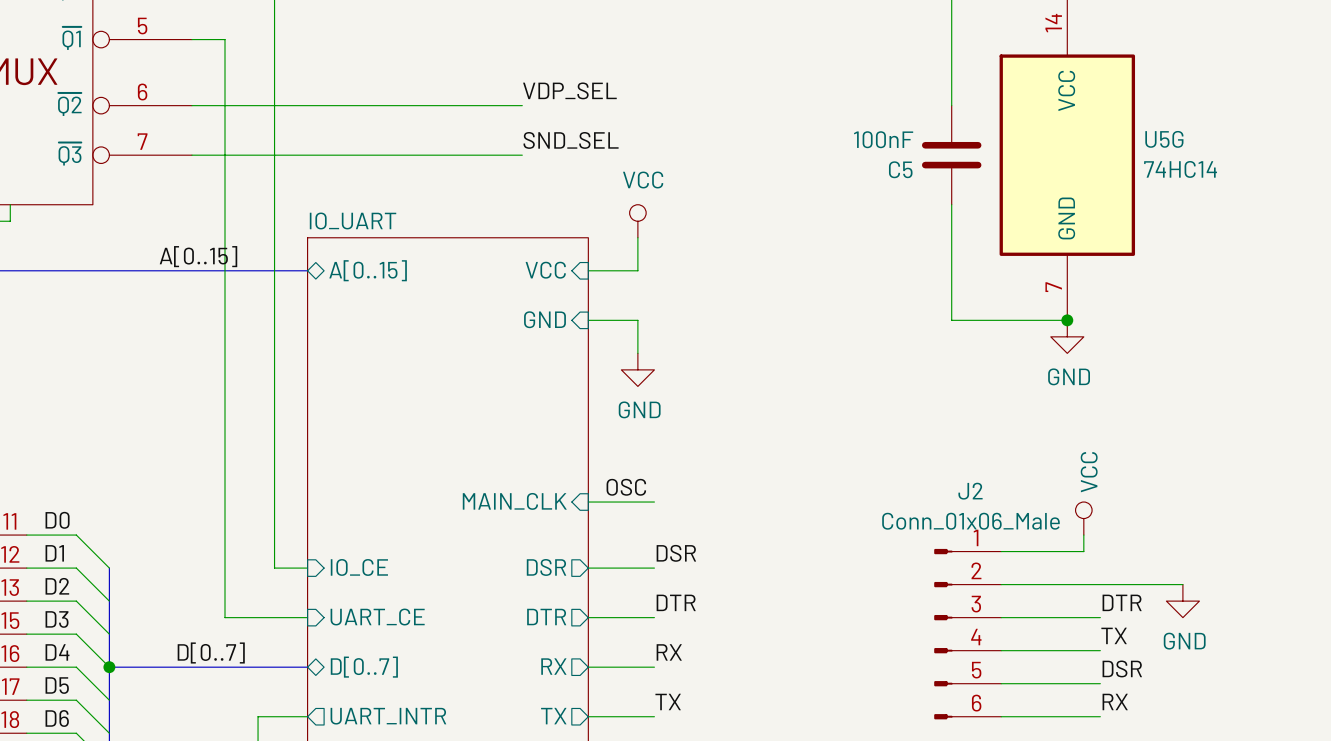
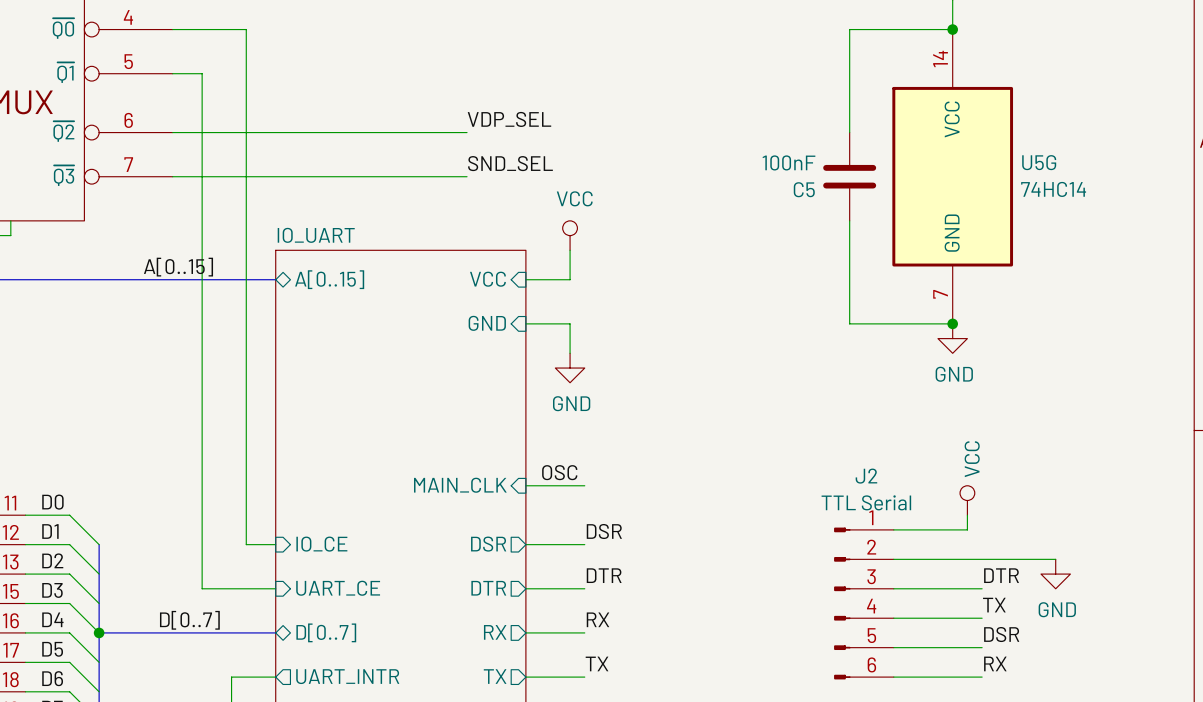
J2 value: Conn_01x06_Male (970, 521) -> TTL Serial (866, 502)

